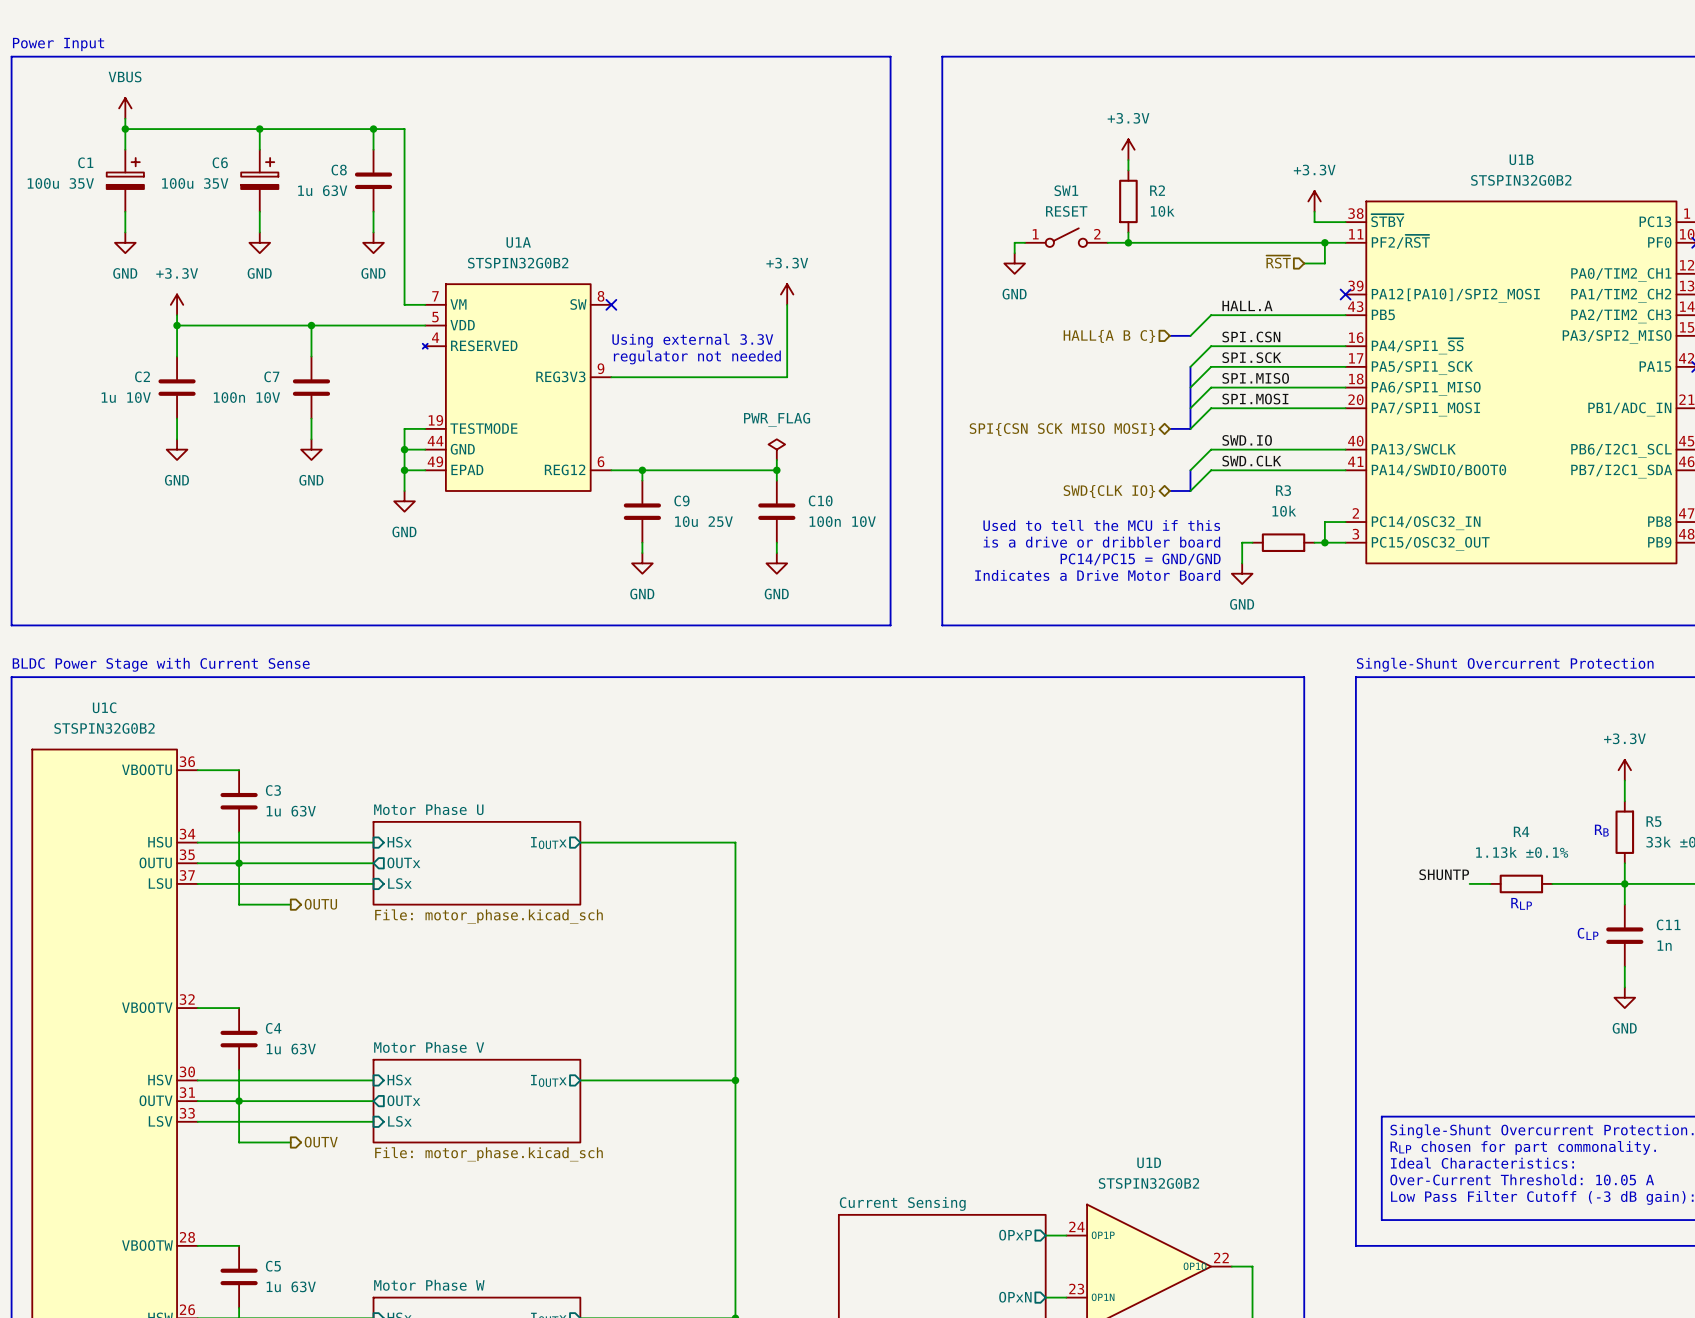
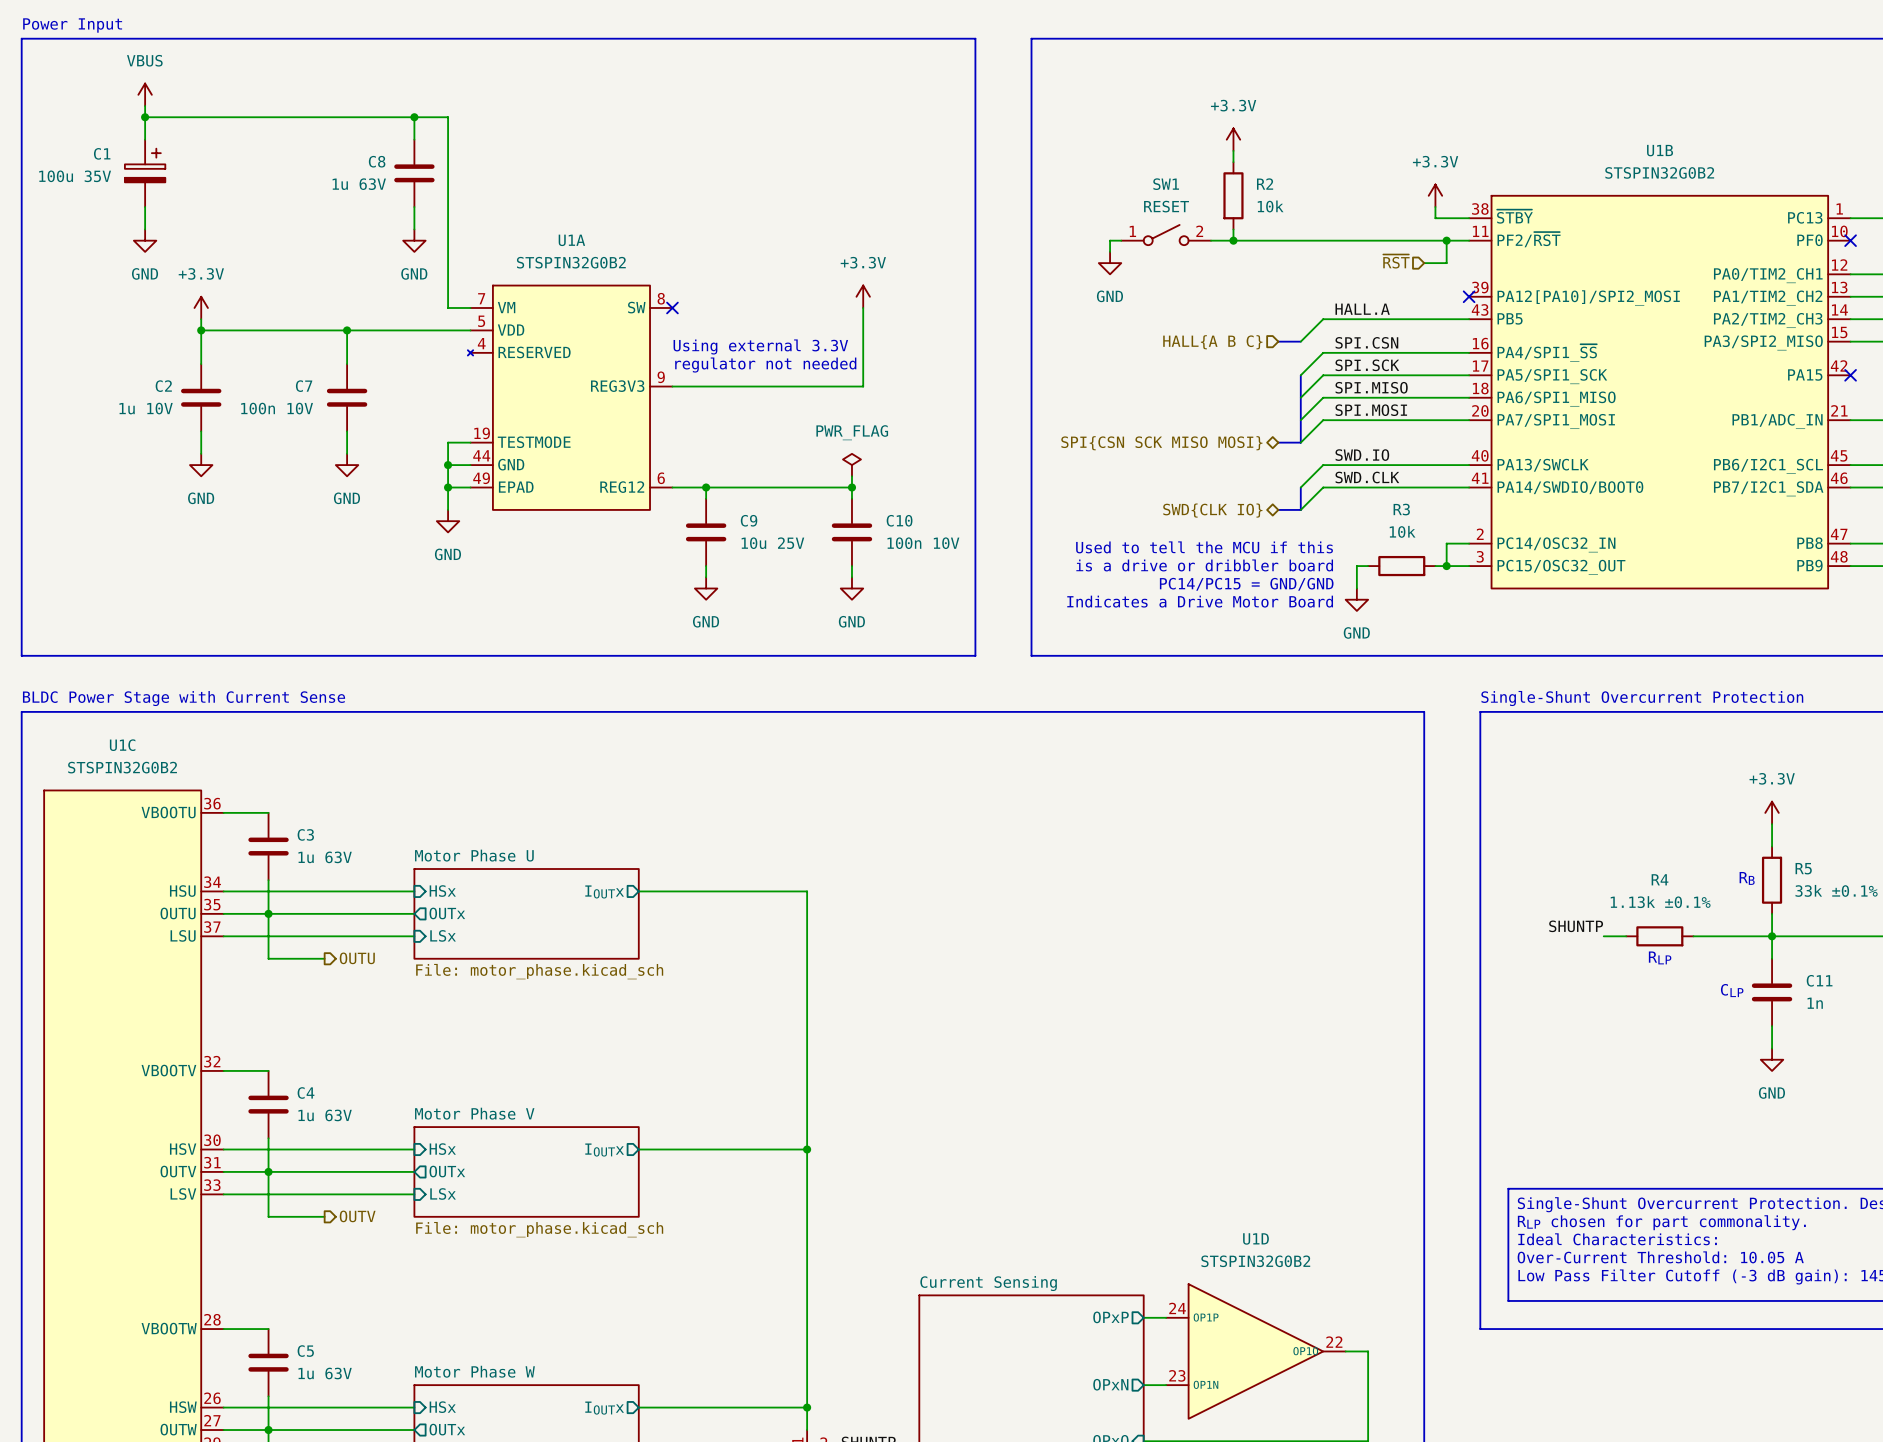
wire: (259, 129) (259, 149) -> none
junction: (259, 129) -> none
C6: 100u 35V (259, 180) -> none
wire: (259, 211) (259, 232) -> none
power symbol: GND (259, 242) -> none

